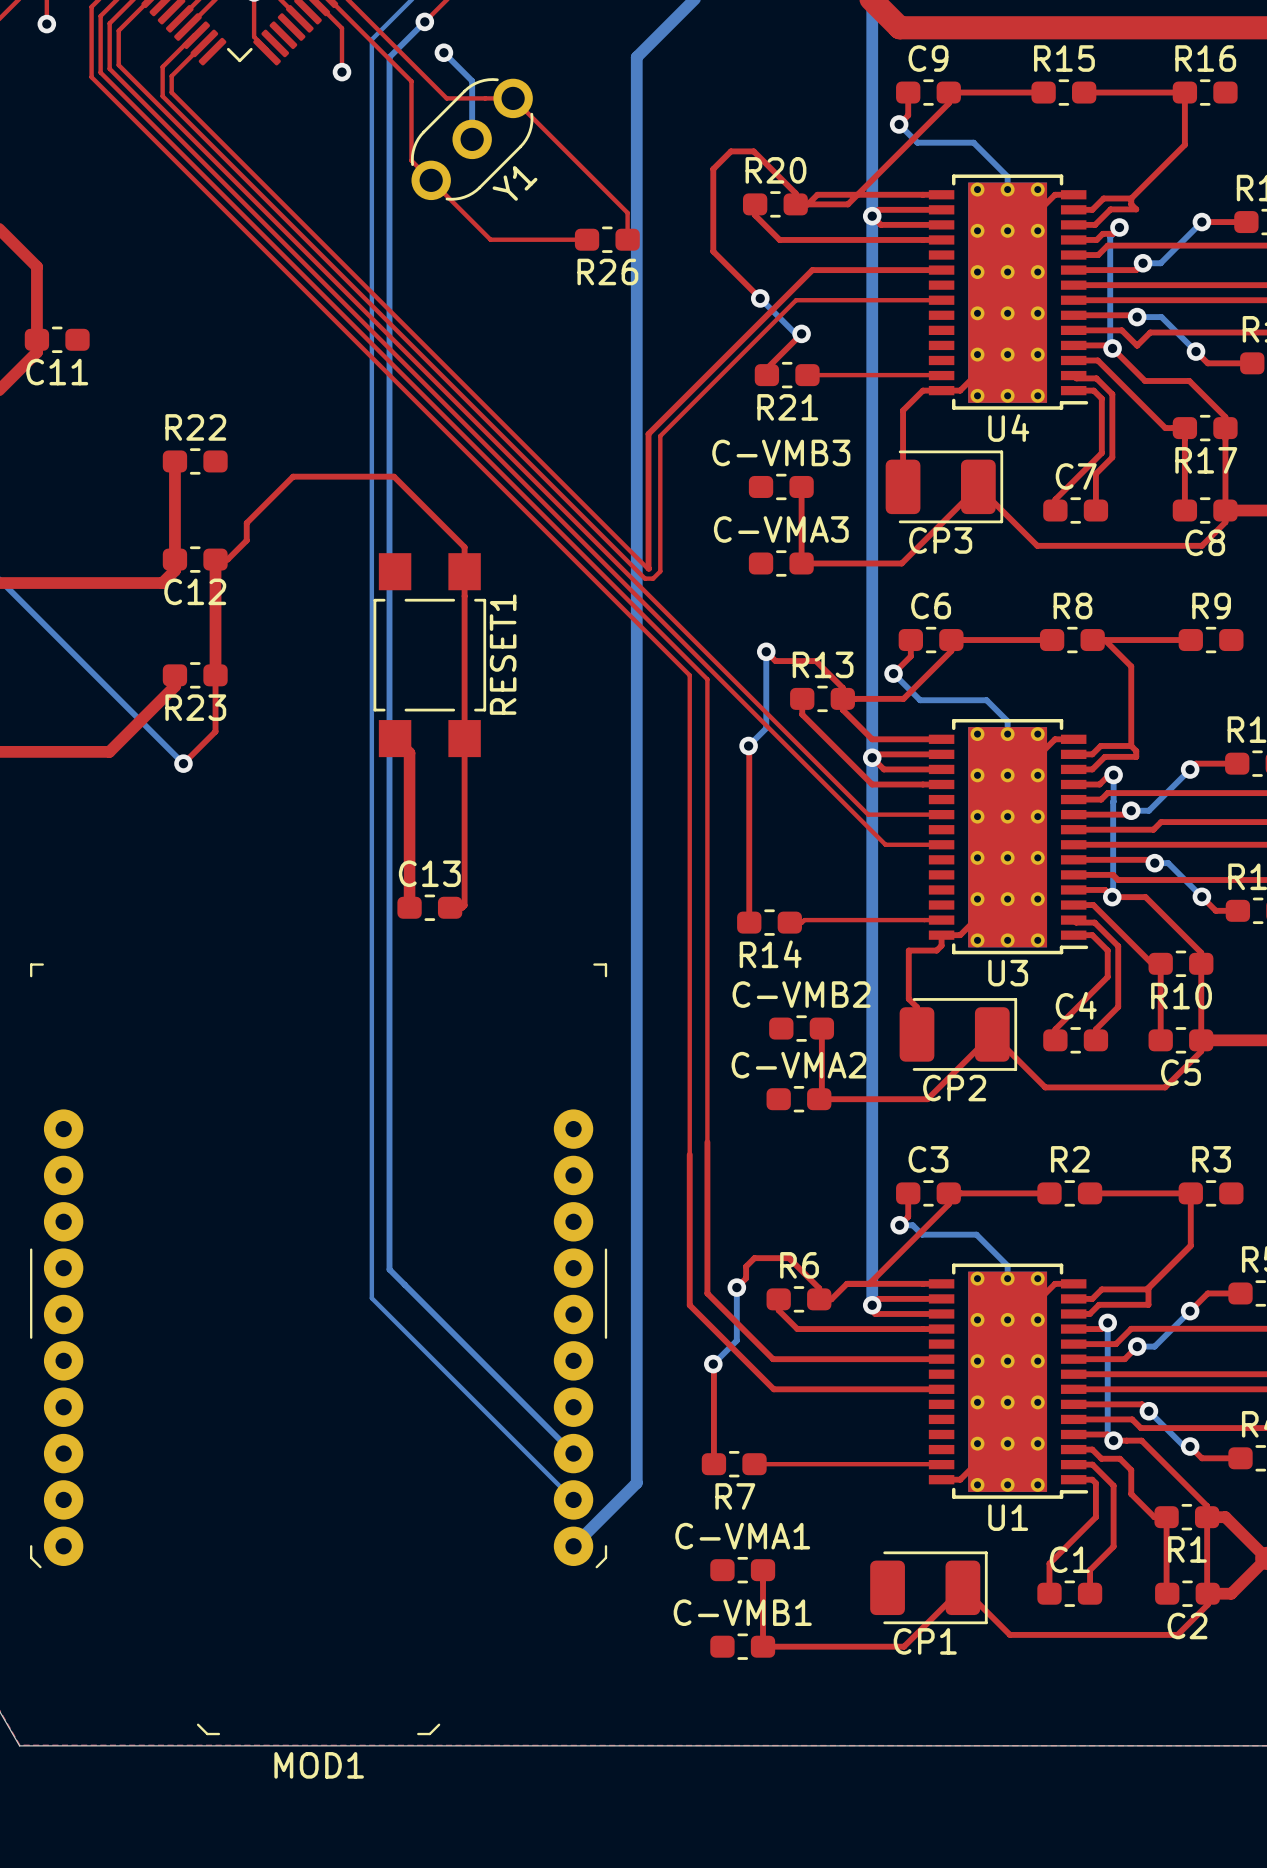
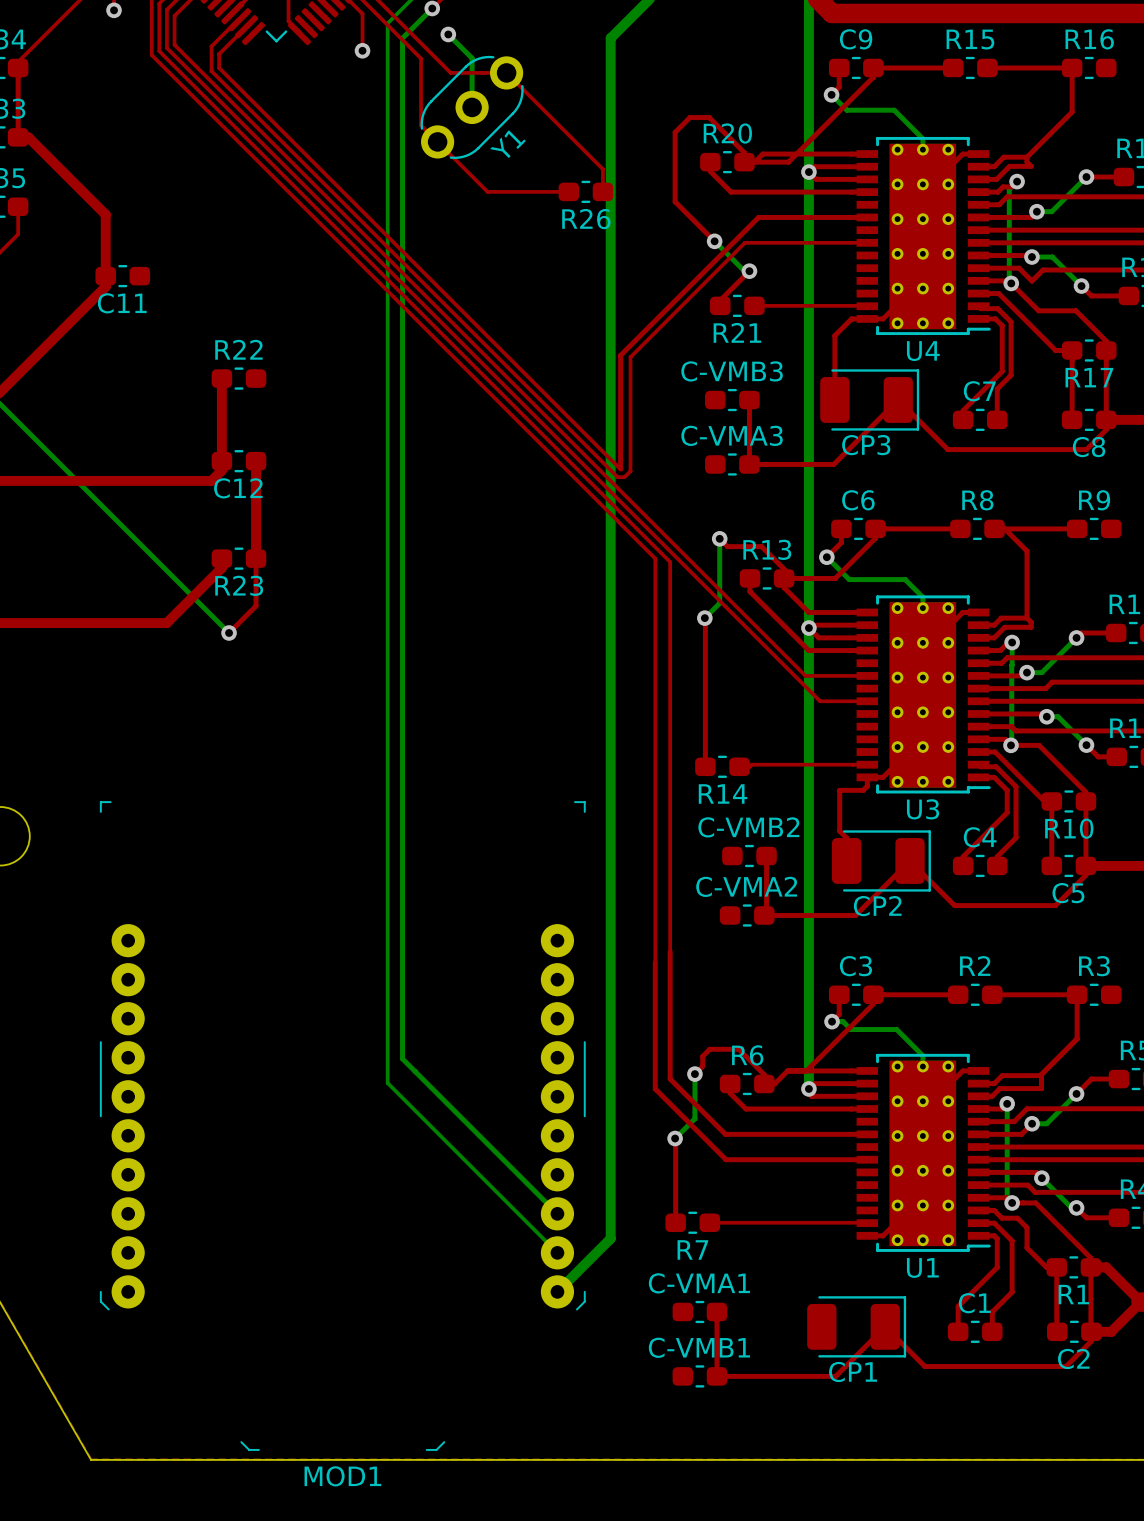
top track: (215, 559) (227, 559) (246, 540) (246, 523) (293, 476) (394, 476) (464, 547) (464, 905) (462, 907) (450, 907) -> none
RESET1: (429, 655) -> none
top track: (395, 738) (409, 753) (409, 907) -> none
C13: (429, 907) -> none

